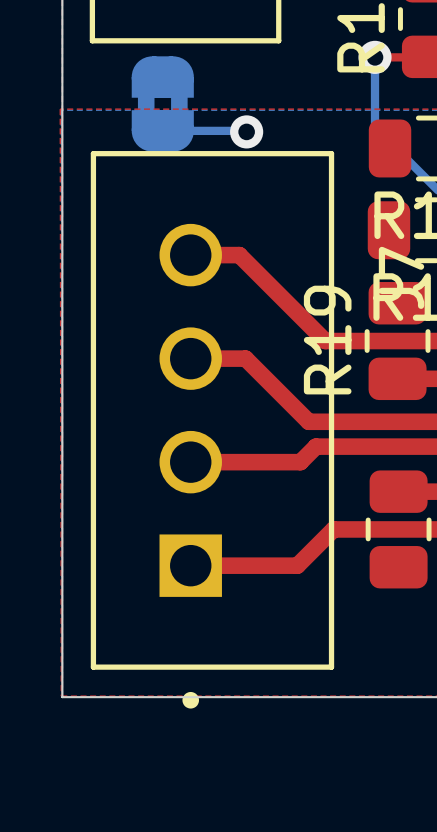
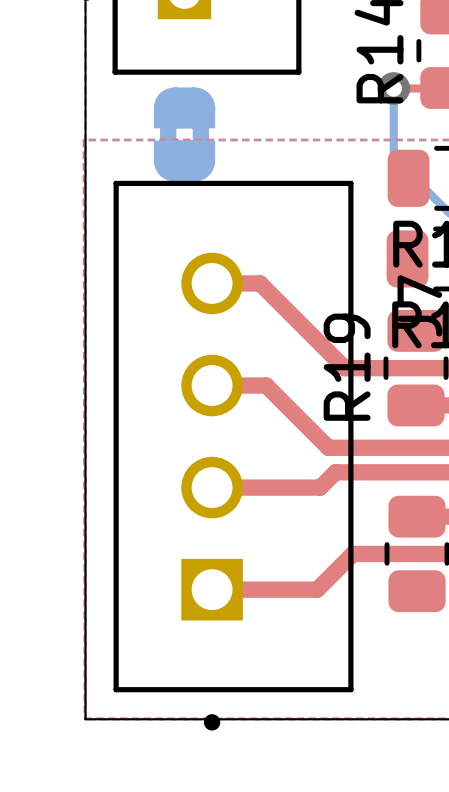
bottom track: (162, 130) (246, 131) -> none
via: (246, 131) -> none

